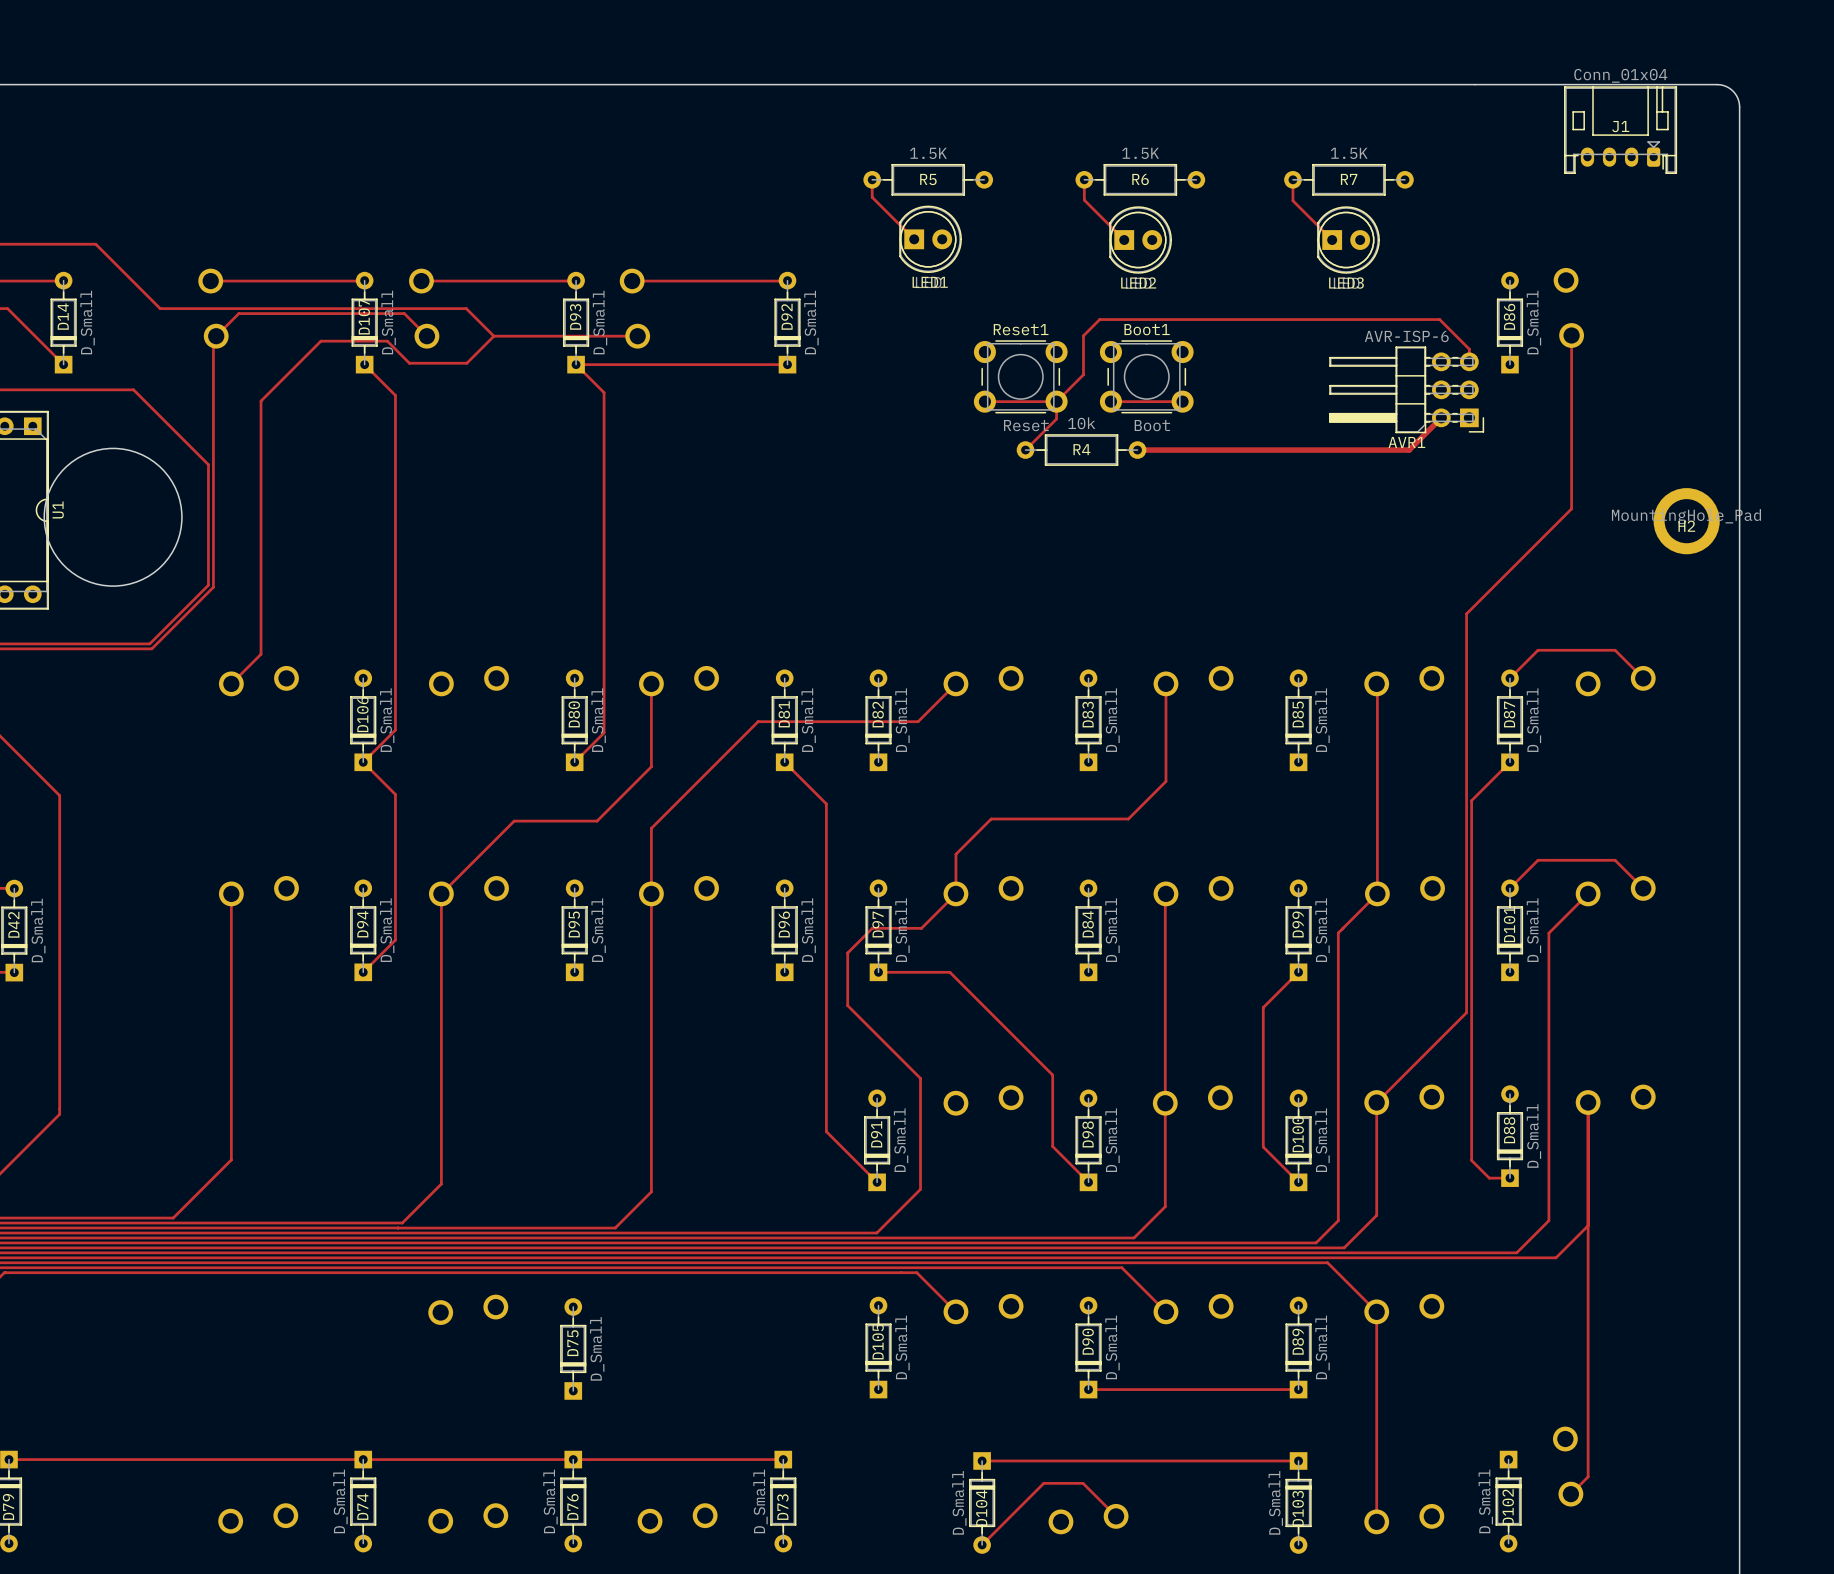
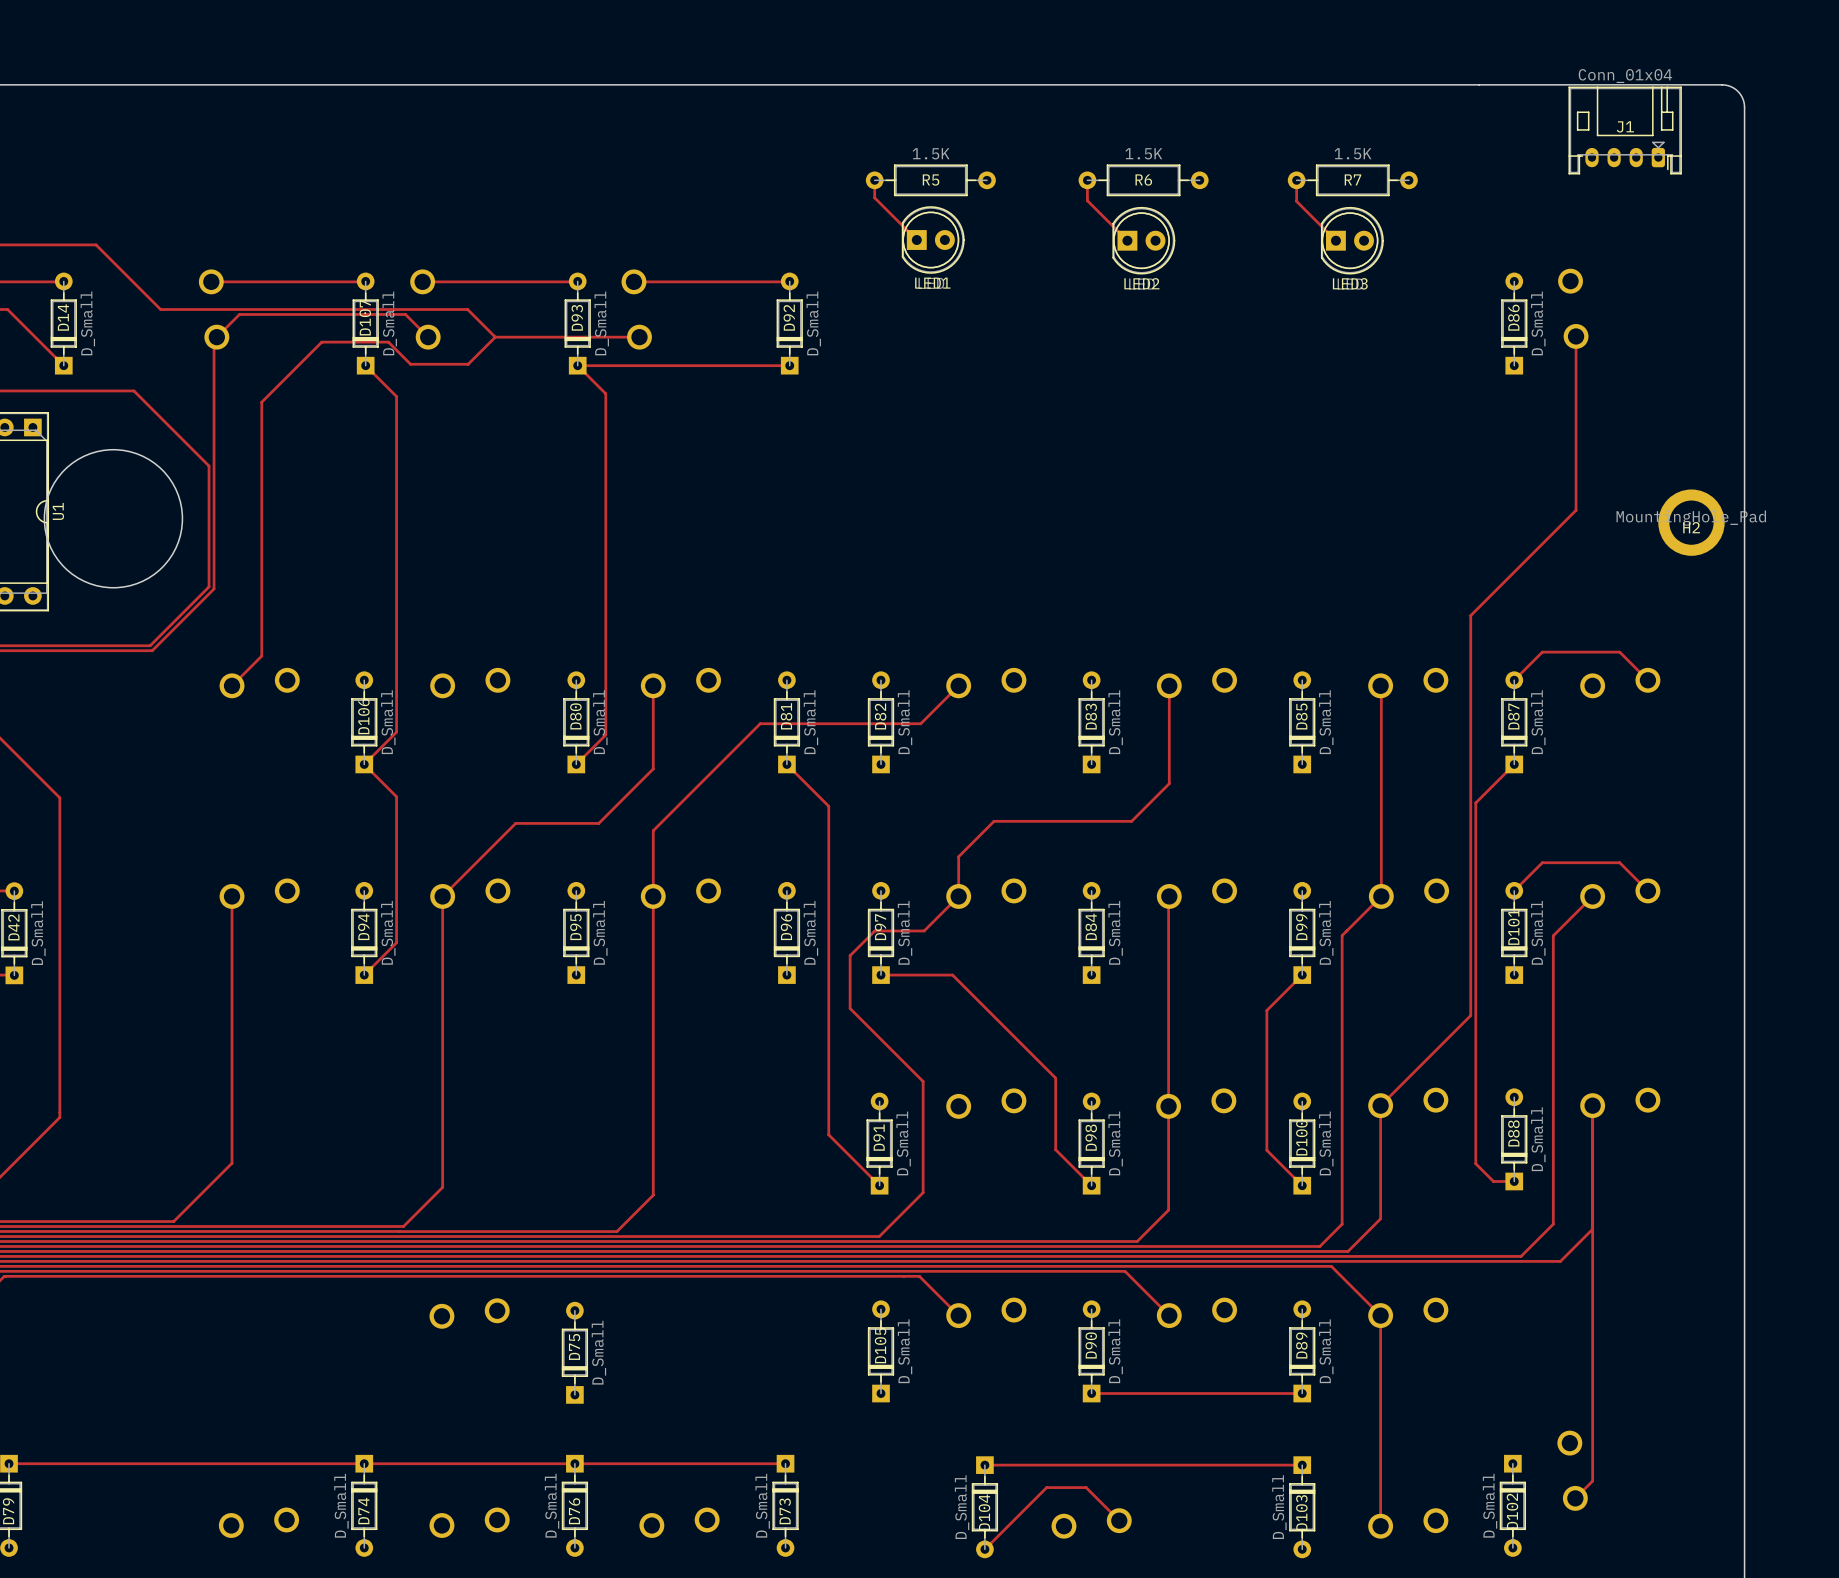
track: (1469, 361) (1469, 349) (1439, 319) (1099, 319) (1083, 335) (1083, 374) (1056, 401) -> none
Reset1: Reset (1020, 376) -> none
Boot1: Boot (1146, 376) -> none
AVR1: AVR-ISP-6 (1406, 389) -> none
track: (984, 401) (1056, 401) -> none
track: (1056, 401) (1056, 418) (1025, 450) -> none
track: (1110, 401) (1182, 401) -> none
track: (1441, 417) (1409, 450) (1137, 450) -> none
R4: 10k (1081, 450) -> none

